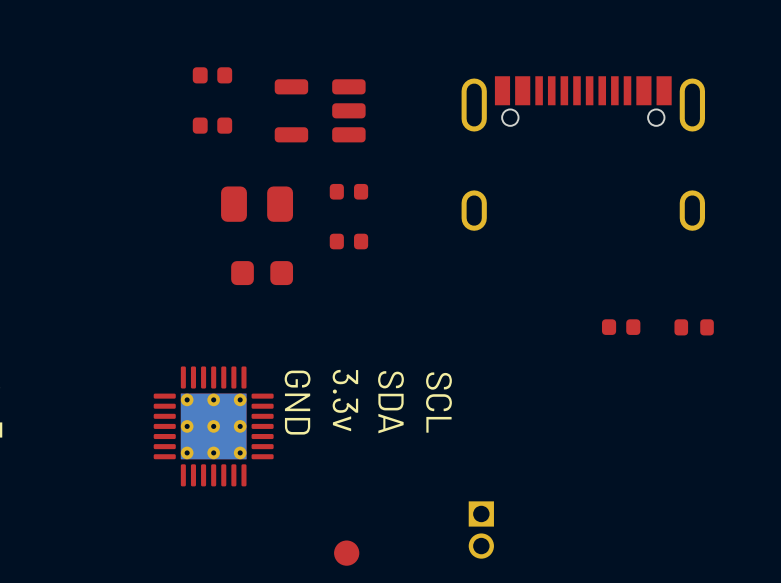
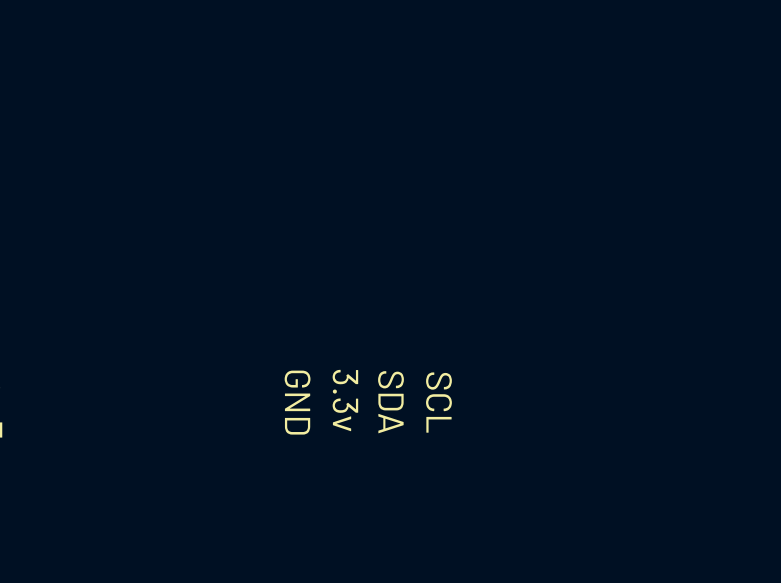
part: (212, 75) -> none
part: (320, 110) -> none
part: (212, 125) -> none
part: (583, 153) -> none
part: (348, 191) -> none
part: (257, 204) -> none
part: (348, 241) -> none
part: (262, 273) -> none
part: (621, 327) -> none
part: (694, 327) -> none
part: (213, 426) -> none
part: (481, 530) -> none
part: (346, 553) -> none

